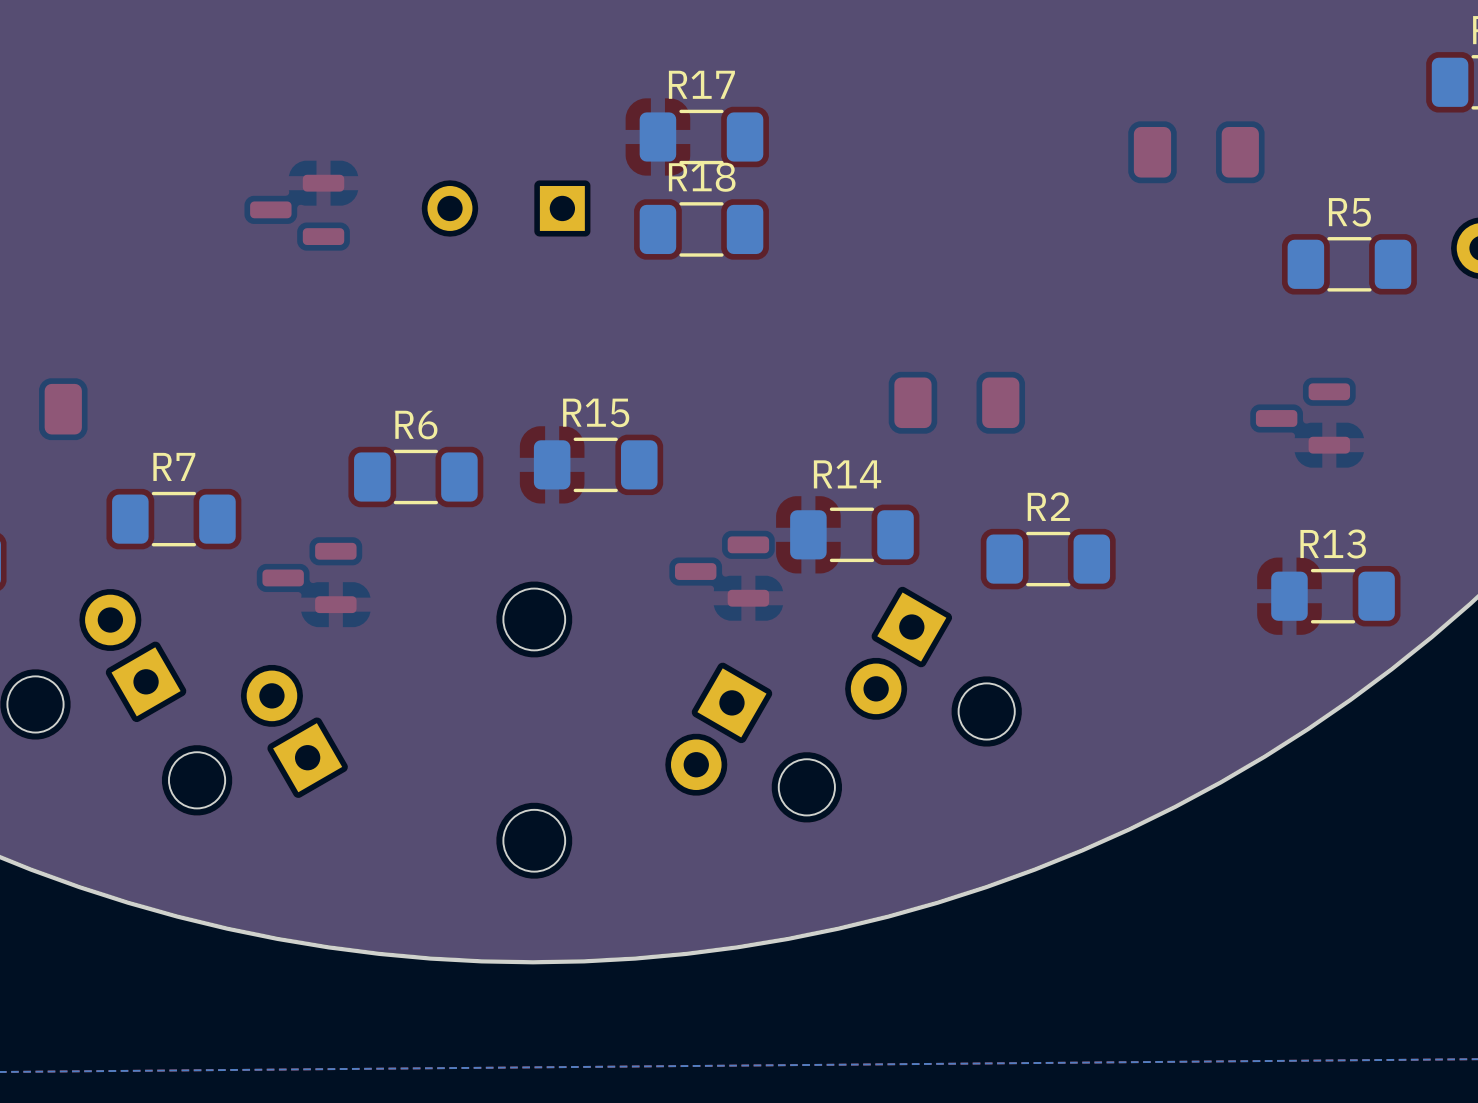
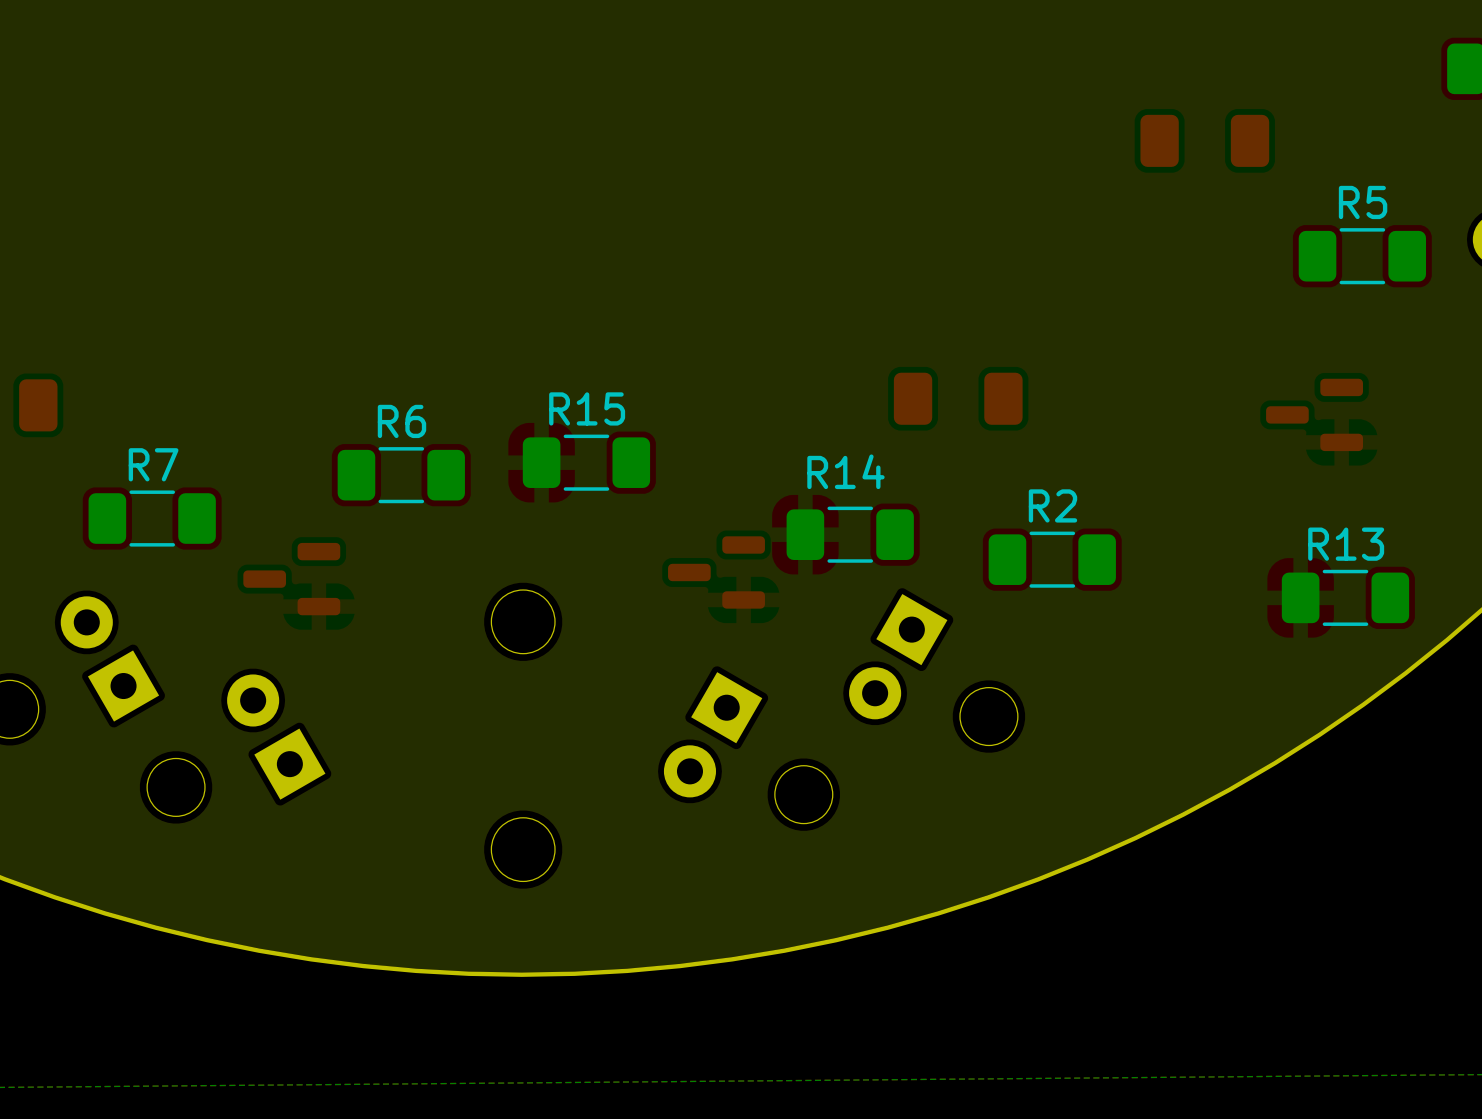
R17: (701, 136) -> none
part: (506, 208) -> none
part: (297, 209) -> none
R18: (701, 229) -> none

